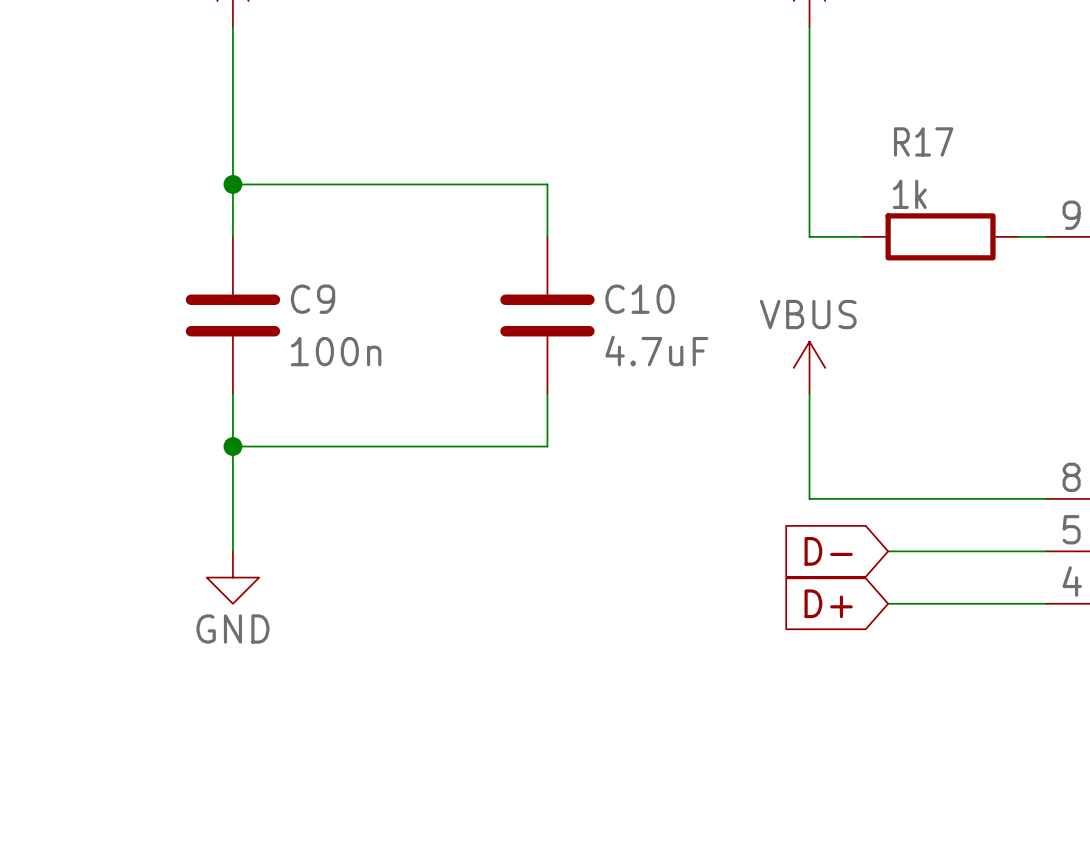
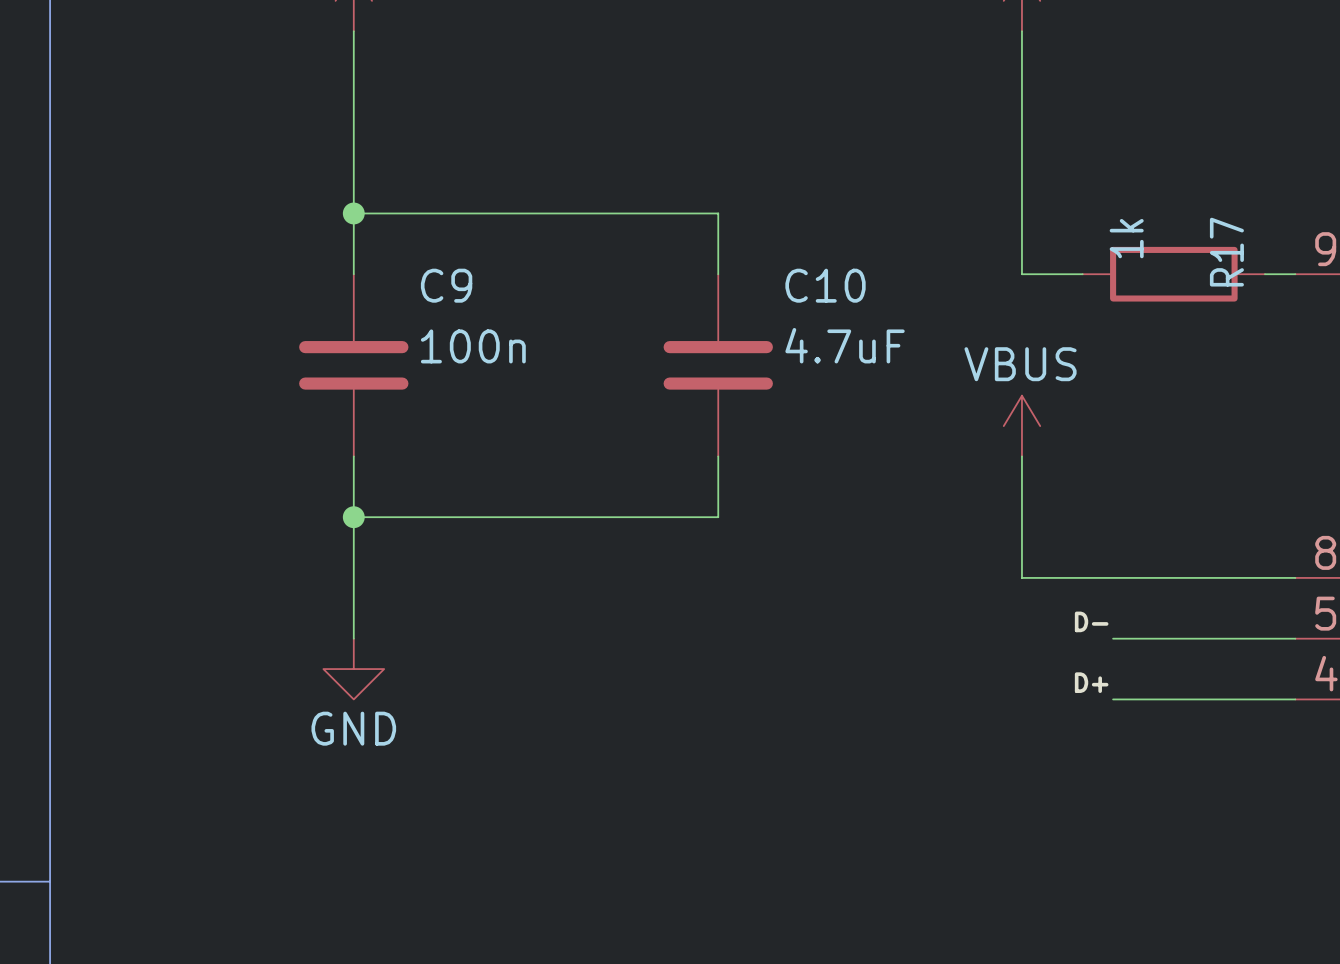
R17 name rotation: 0° (923, 141) -> 90° counterclockwise (1226, 252)
R17 name position: R17 (923, 141) -> R17 (1226, 252)
R17 value rotation: 0° (909, 194) -> 90° counterclockwise (1126, 238)
C9 name position: C9 (313, 299) -> C9 (446, 285)
C10 name position: C10 (639, 299) -> C10 (825, 285)
C10 value position: 4.7uF (656, 350) -> 4.7uF (845, 345)
C9 value position: 100n (336, 351) -> 100n (473, 346)
label: none -> D- (1091, 621)
global label: D- (828, 551) -> none
label: none -> D+ (1091, 682)
global label: D+ (828, 603) -> none

